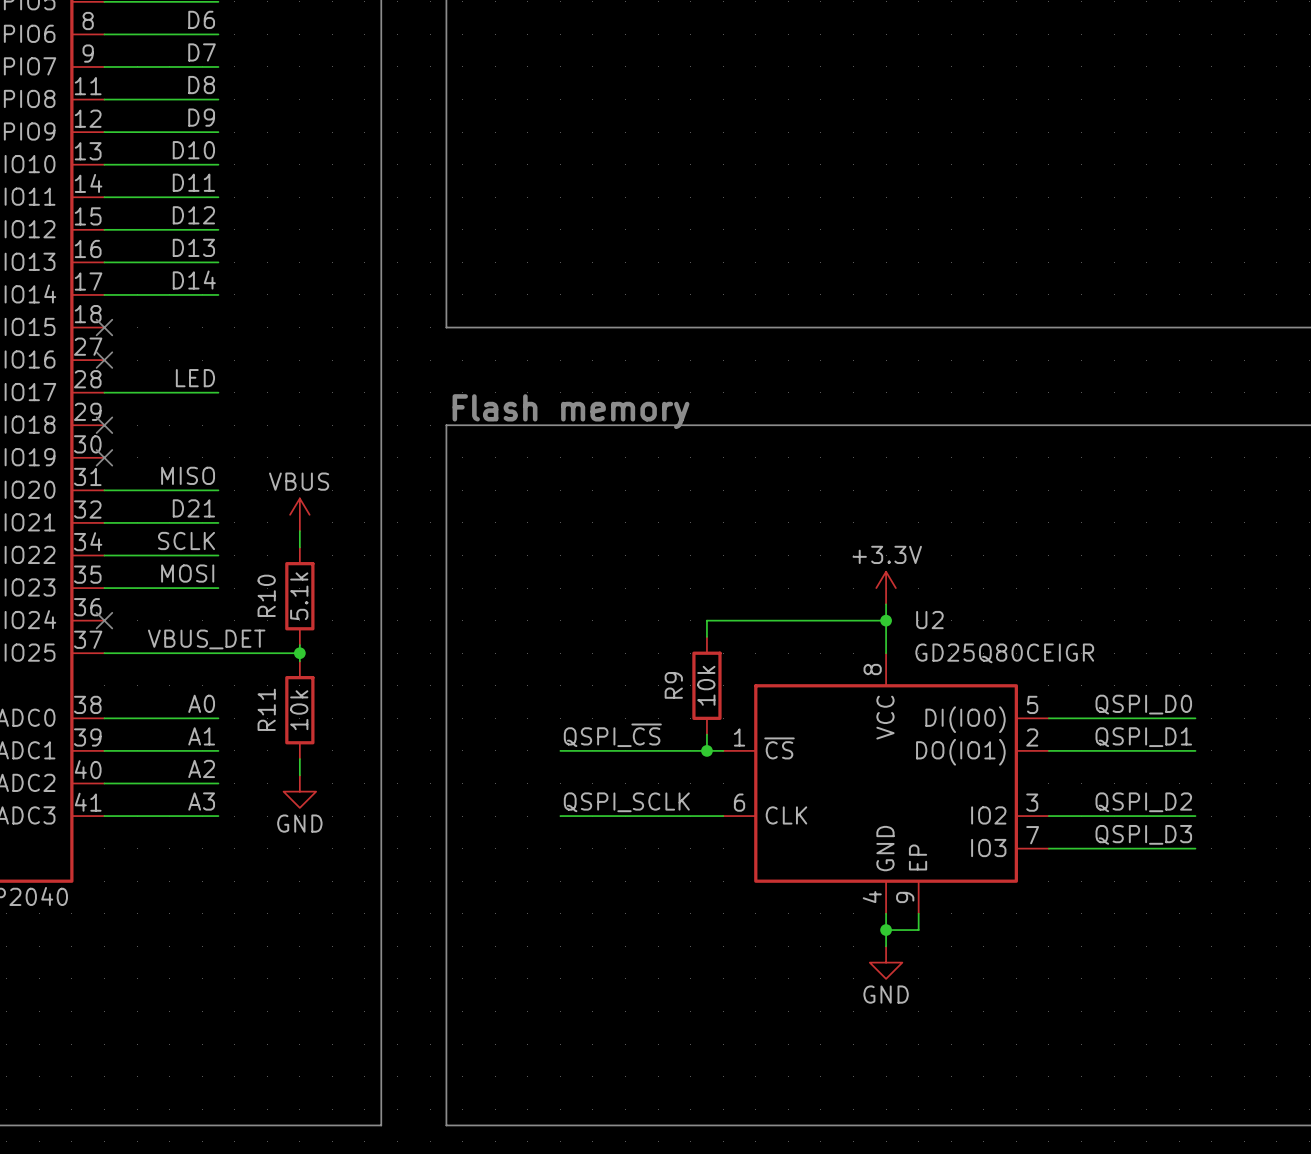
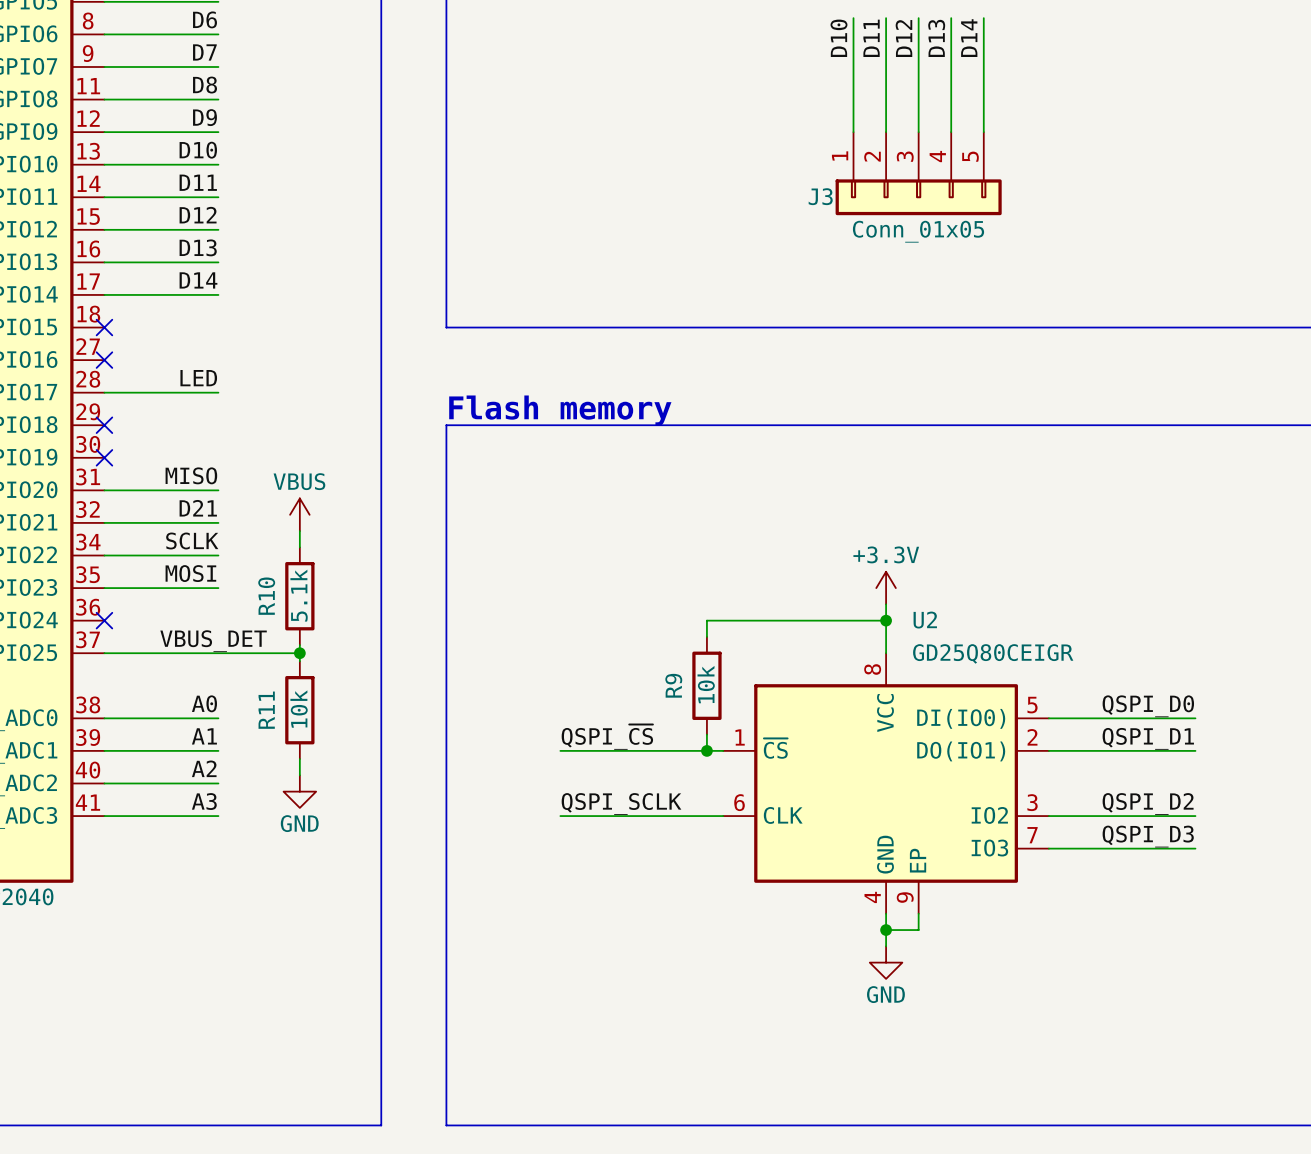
wire: none -> (853, 18) (853, 132)
wire: none -> (886, 18) (886, 132)
wire: none -> (918, 18) (918, 132)
wire: none -> (951, 18) (951, 132)
wire: none -> (983, 18) (983, 132)
label: none -> D10 (838, 38)
label: none -> D11 (871, 38)
label: none -> D12 (903, 38)
label: none -> D13 (936, 38)
label: none -> D14 (969, 38)
J3: none -> Conn_01x05 (918, 173)

